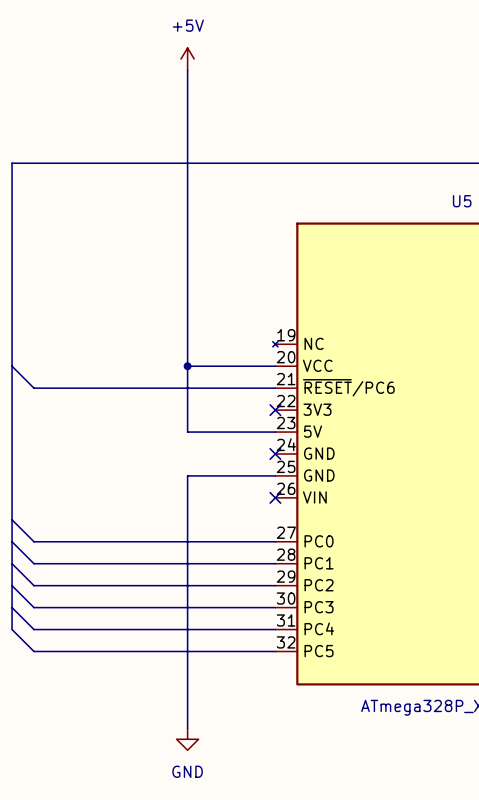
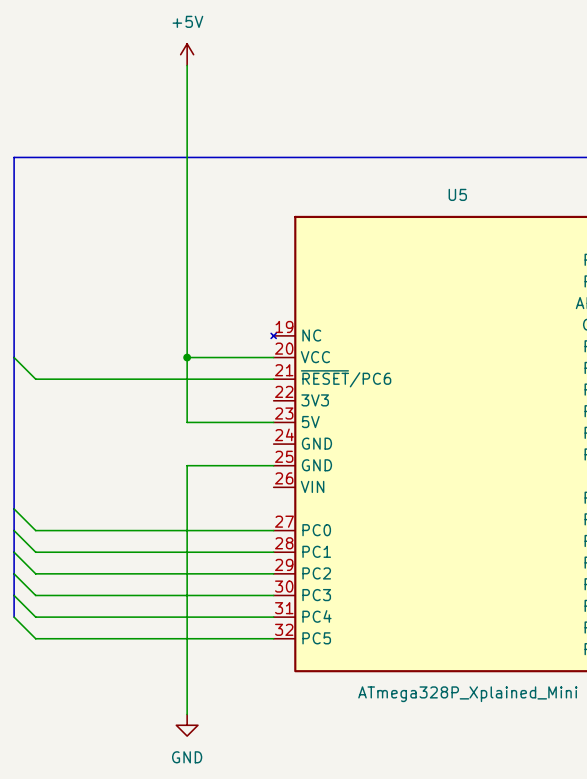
no-connect mark: (275, 410) -> none
no-connect mark: (275, 453) -> none
no-connect mark: (275, 497) -> none

